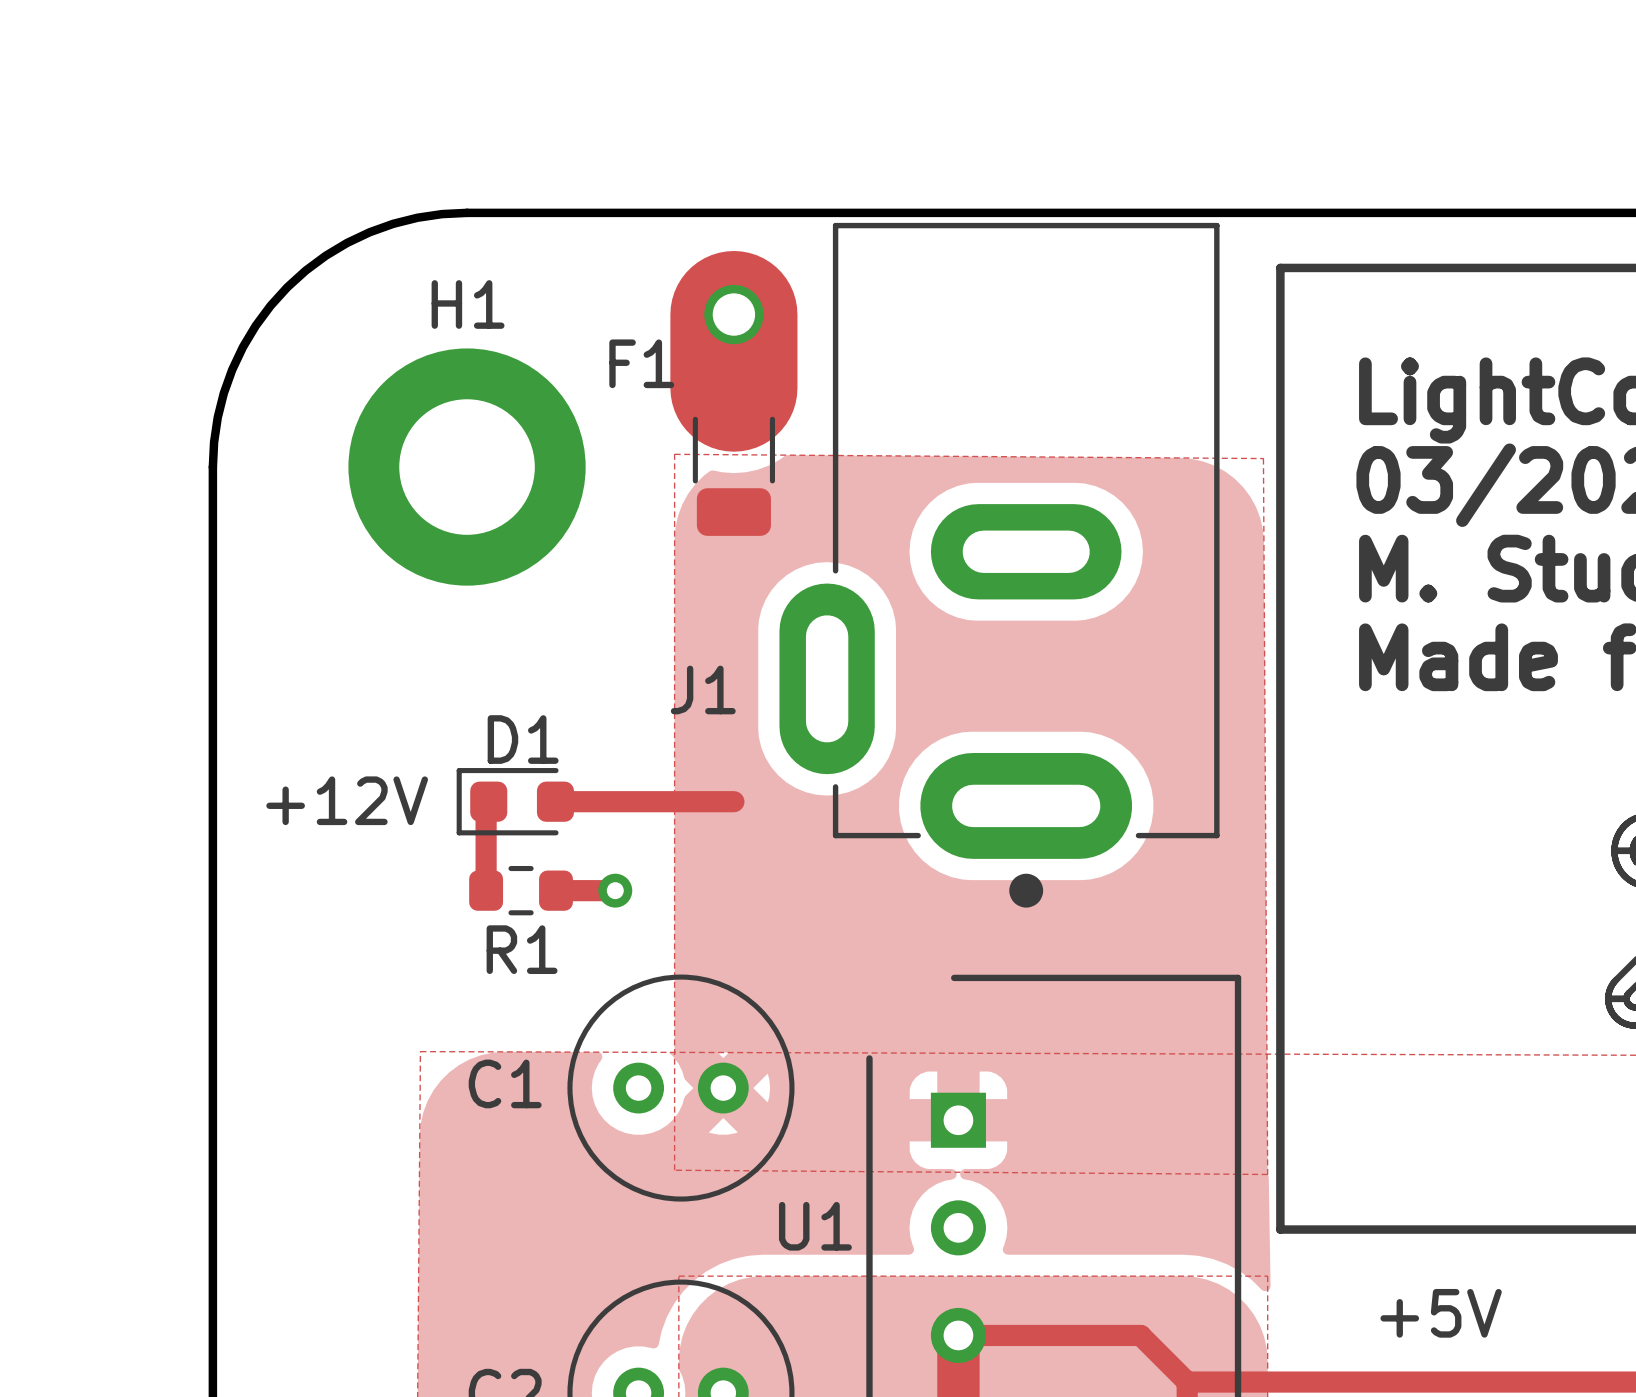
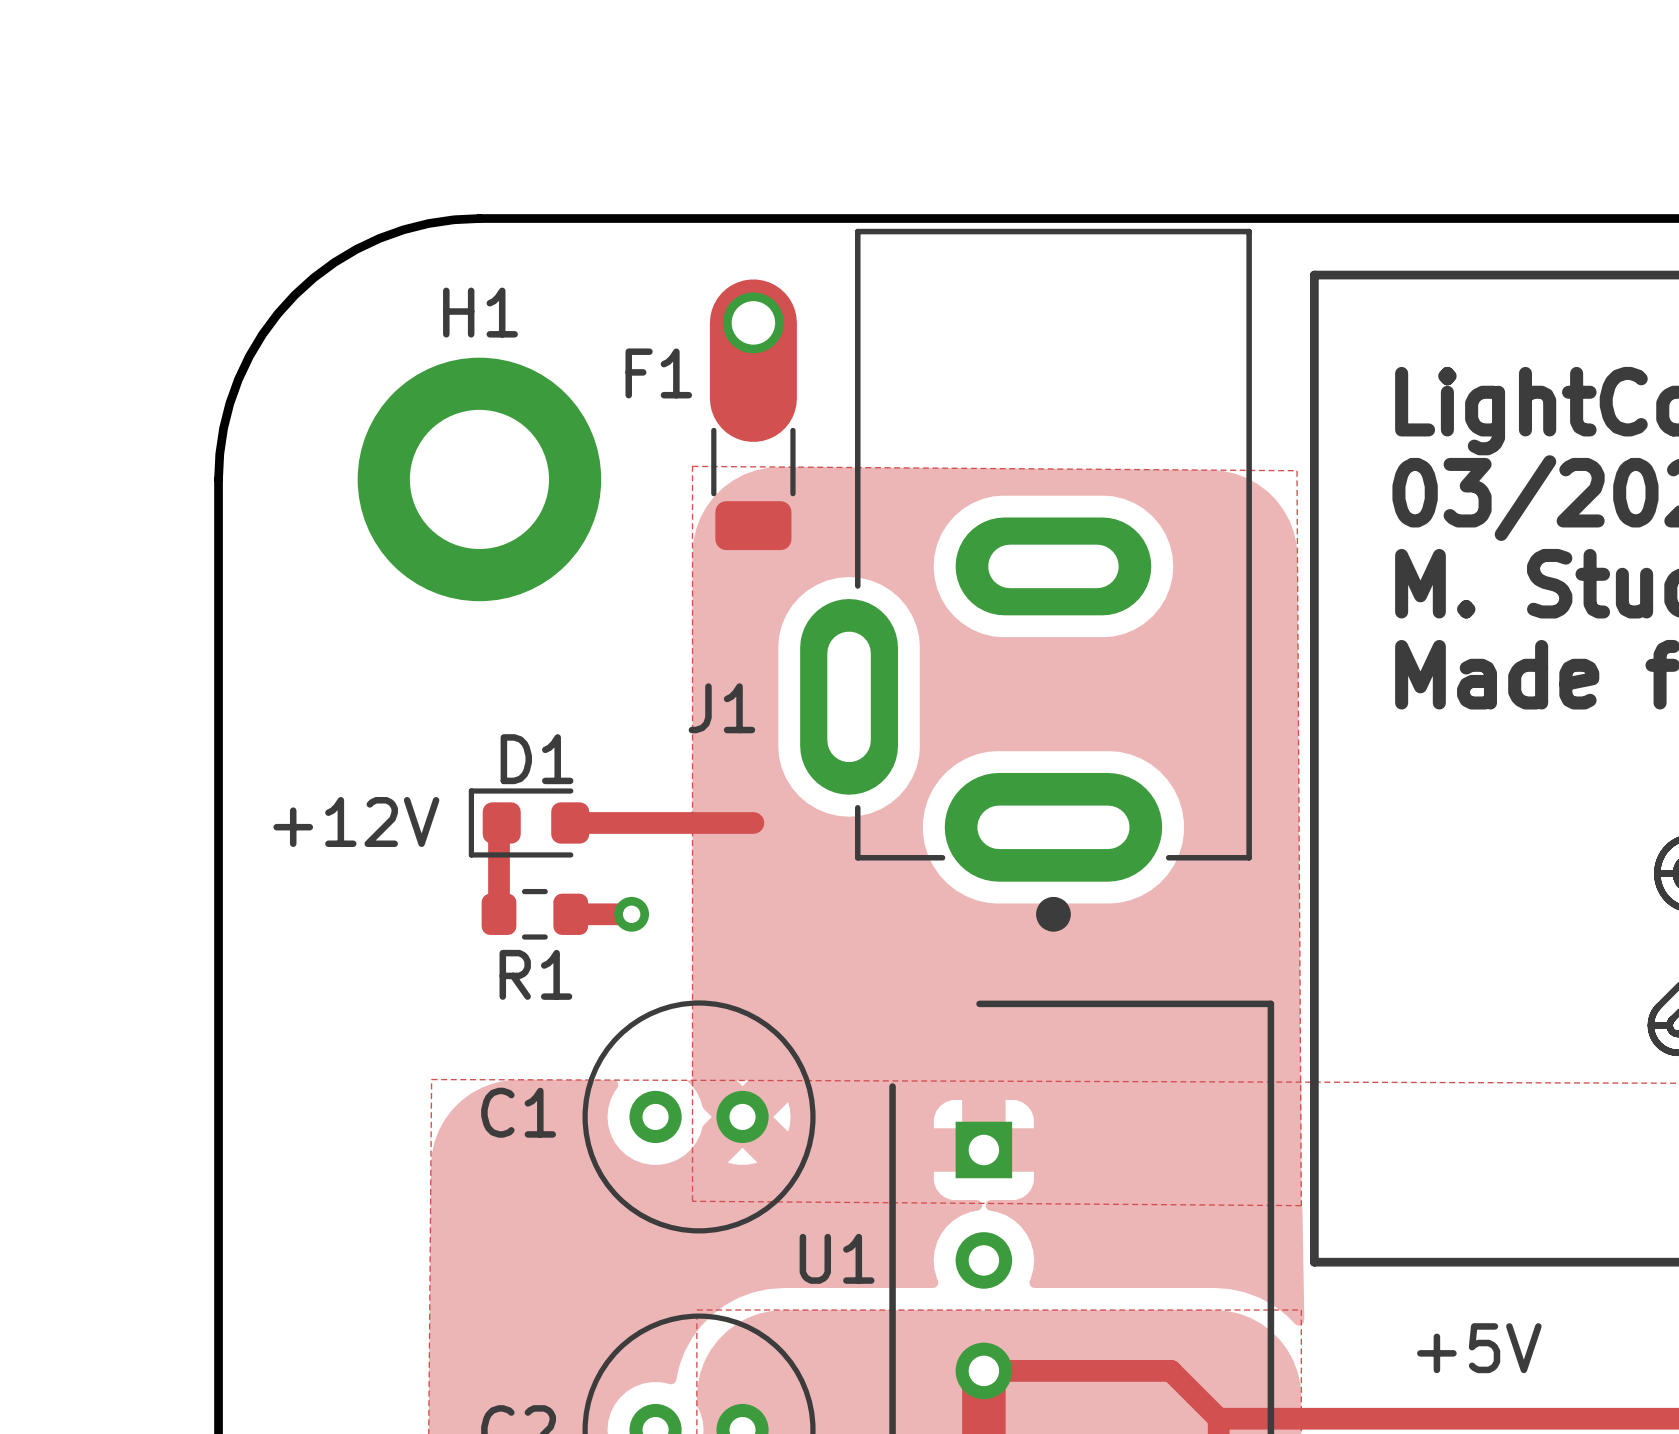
track width: thick (733, 314) (733, 388) -> thin (753, 322) (753, 398)

